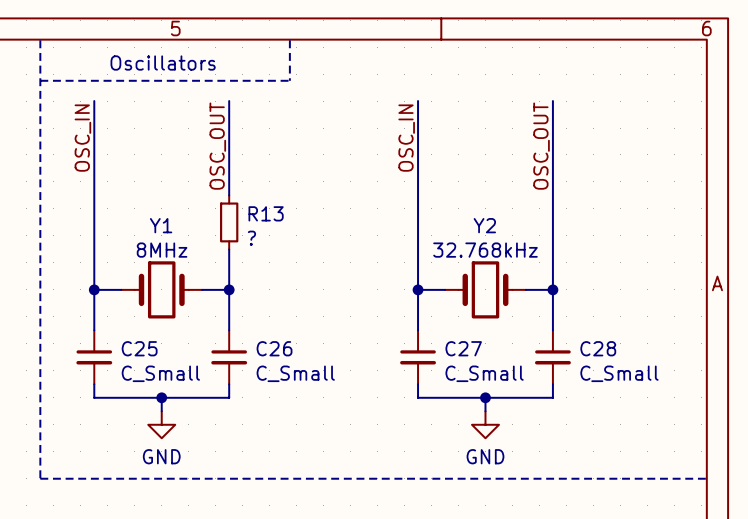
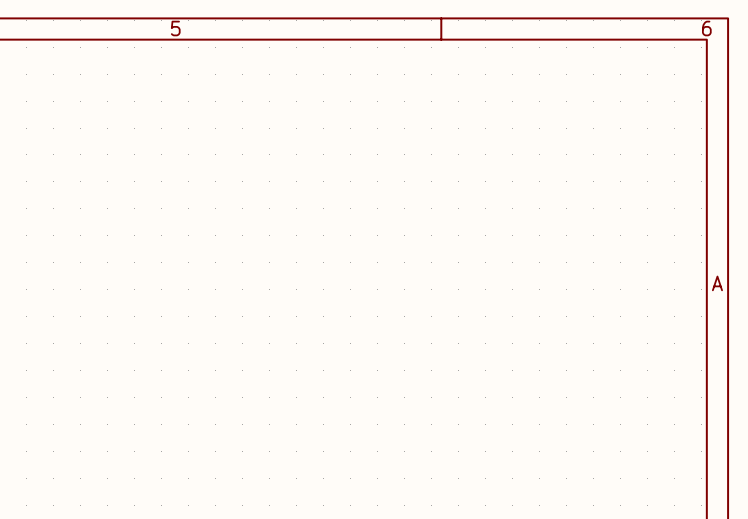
line: (40, 40) (40, 478) (708, 478) -> none
line: (289, 40) (289, 80) (40, 80) -> none
text: Oscillators (163, 63) -> none
wire: (94, 101) (94, 330) -> none
wire: (229, 101) (229, 195) -> none
wire: (418, 101) (418, 330) -> none
wire: (552, 101) (552, 330) -> none
label: OSC_IN (82, 138) -> none
label: OSC_IN (406, 138) -> none
label: OSC_OUT (217, 146) -> none
label: OSC_OUT (541, 146) -> none
R13: ? (229, 222) -> none
wire: (229, 249) (229, 330) -> none
wire: (94, 289) (121, 289) -> none
junction: (94, 289) -> none
Y1: 8MHz (161, 289) -> none
wire: (202, 289) (229, 289) -> none
junction: (229, 289) -> none
wire: (418, 289) (445, 289) -> none
junction: (418, 289) -> none
Y2: 32.768kHz (485, 289) -> none
wire: (525, 289) (552, 289) -> none
junction: (552, 289) -> none
C25: C_Small (94, 357) -> none
C26: C_Small (229, 357) -> none
C27: C_Small (418, 357) -> none
C28: C_Small (552, 357) -> none
wire: (94, 384) (94, 397) (229, 397) (229, 384) -> none
wire: (418, 384) (418, 397) (552, 397) (552, 384) -> none
wire: (161, 397) (161, 411) -> none
junction: (161, 397) -> none
wire: (485, 397) (485, 411) -> none
junction: (485, 397) -> none
power symbol: GND (161, 424) -> none
power symbol: GND (485, 424) -> none

